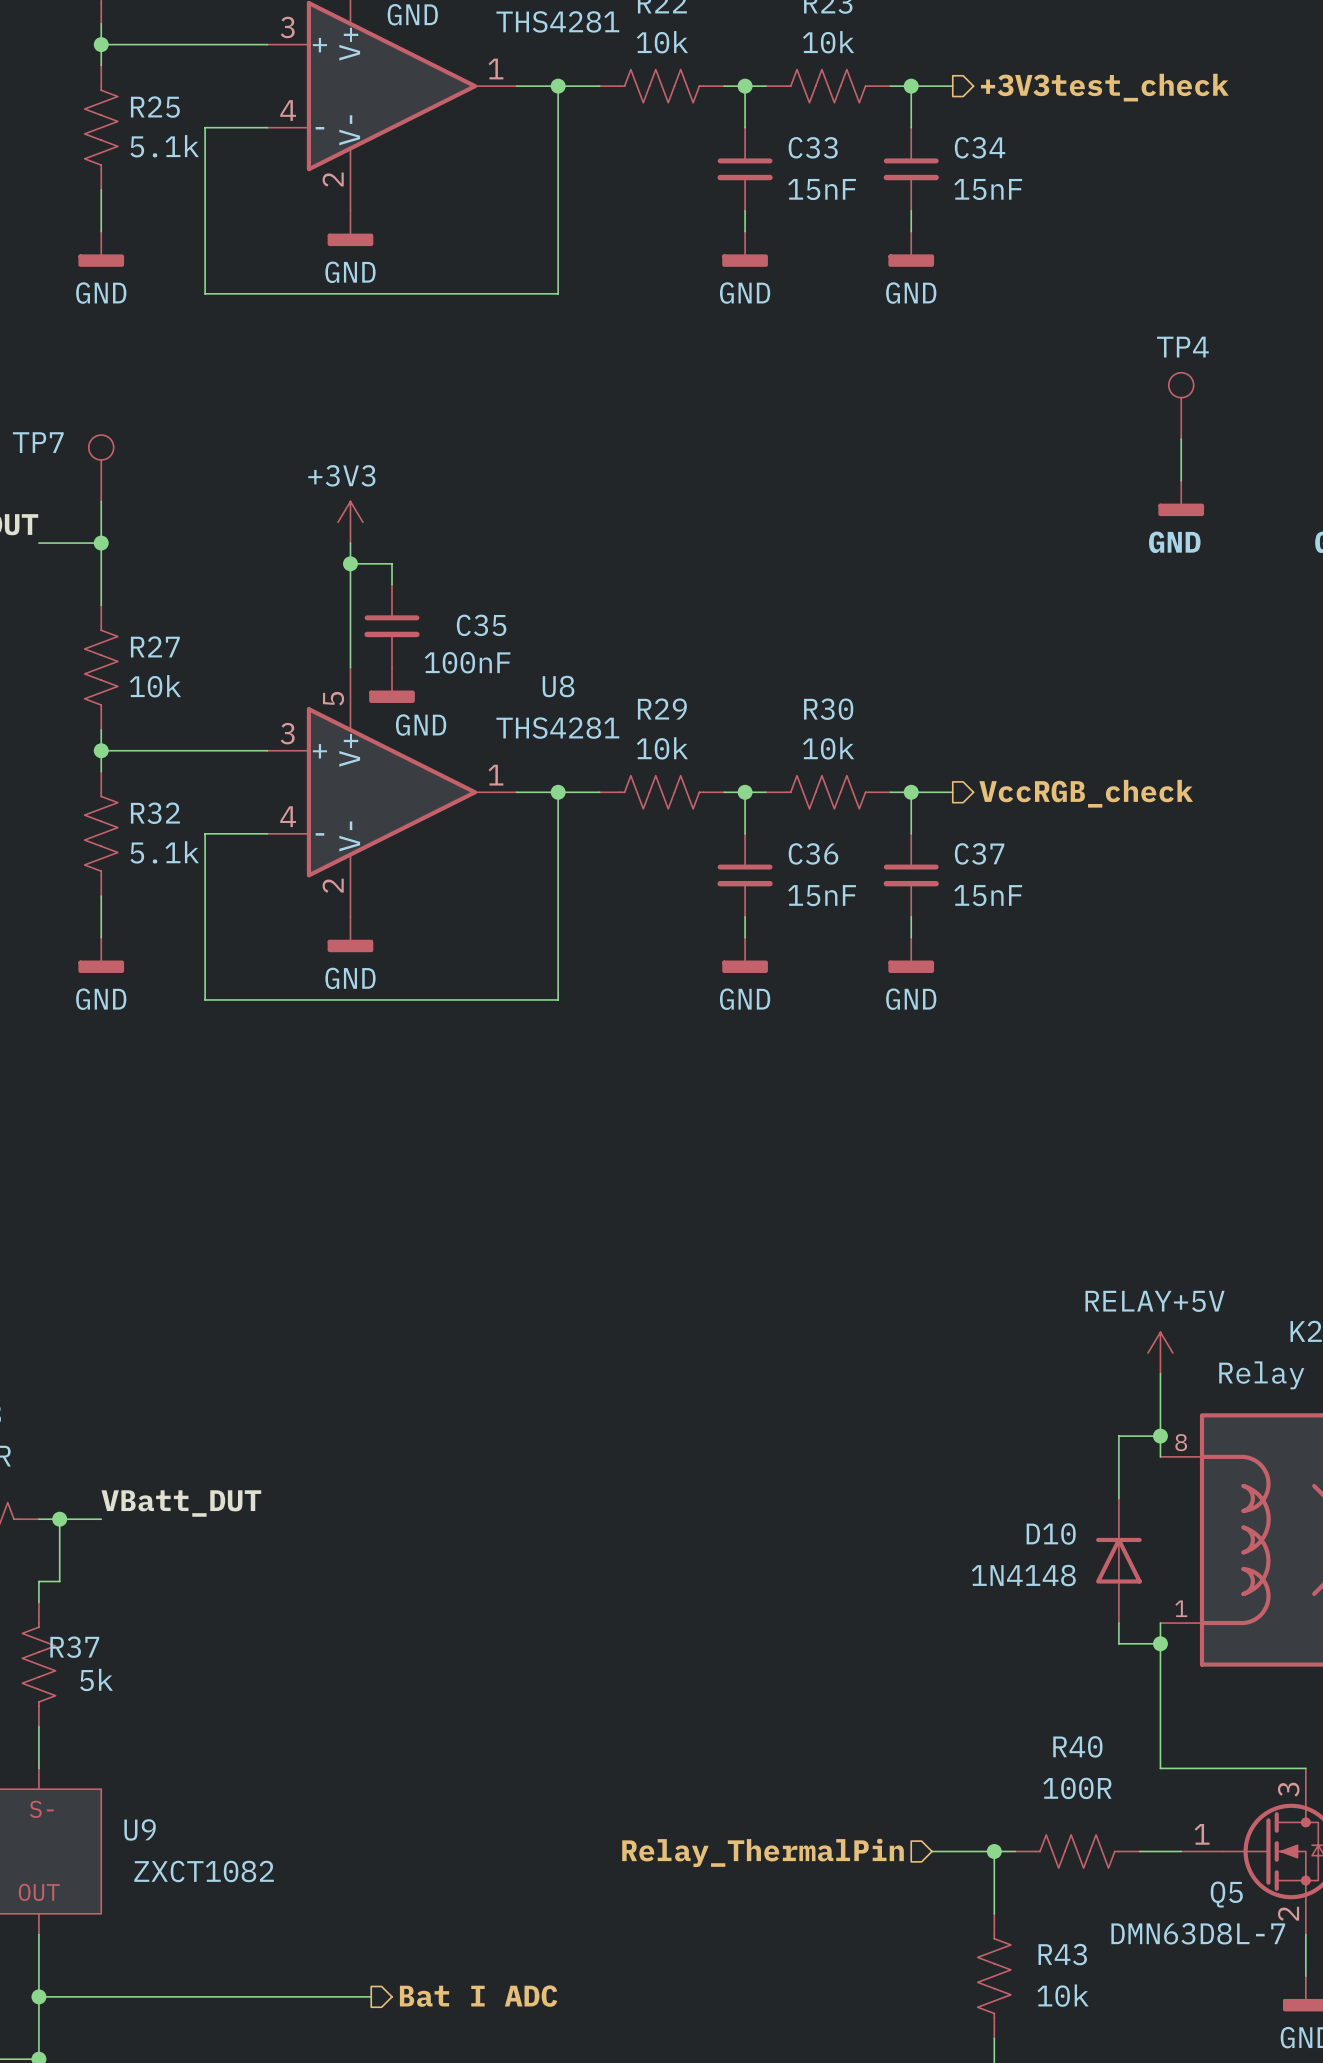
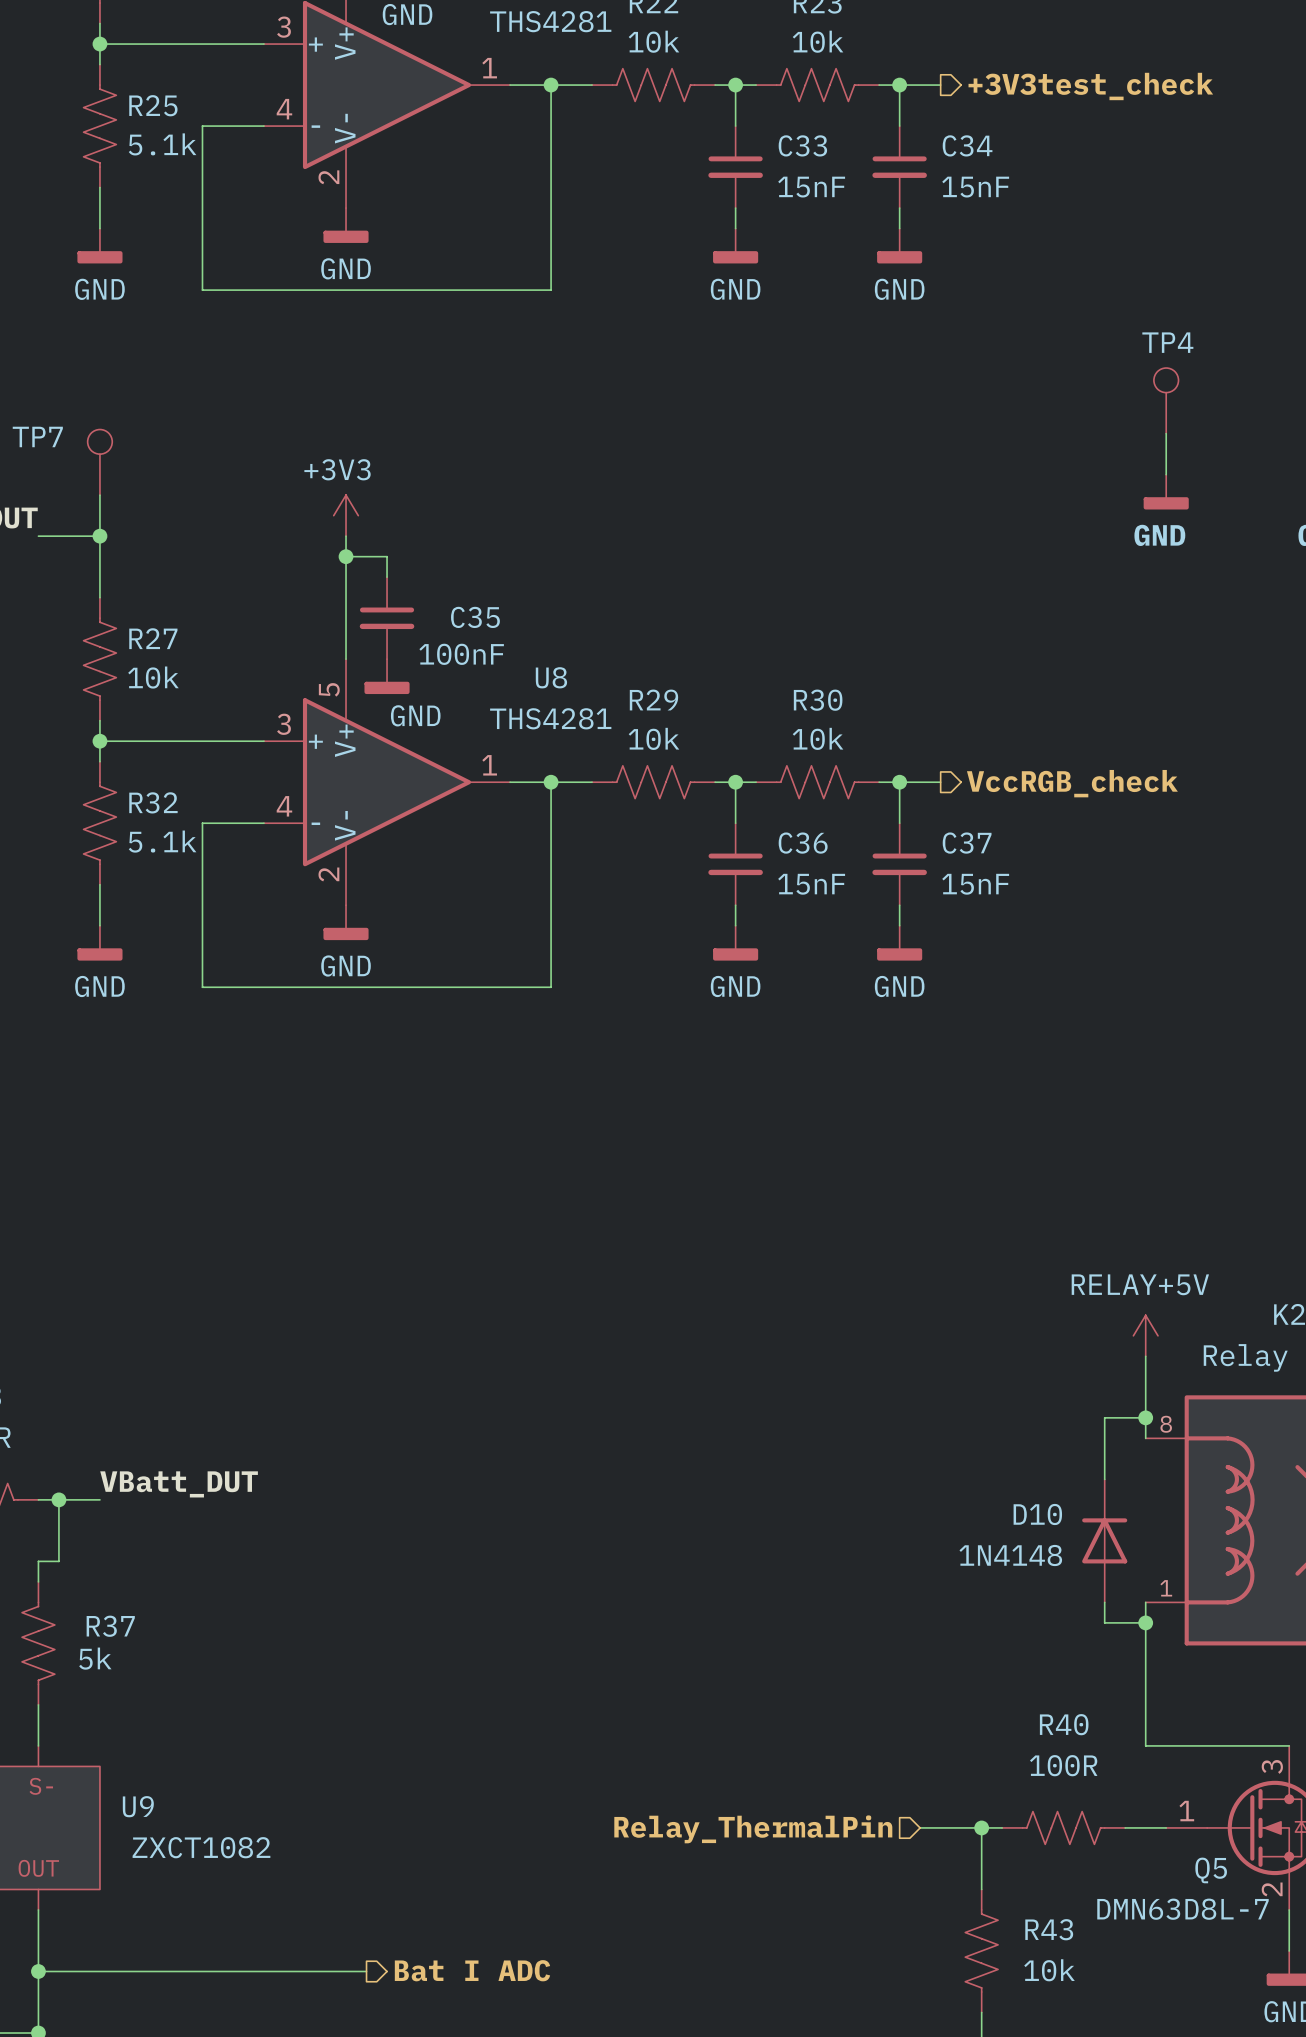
R37 name position: R37 (74, 1647) -> R37 (110, 1626)

